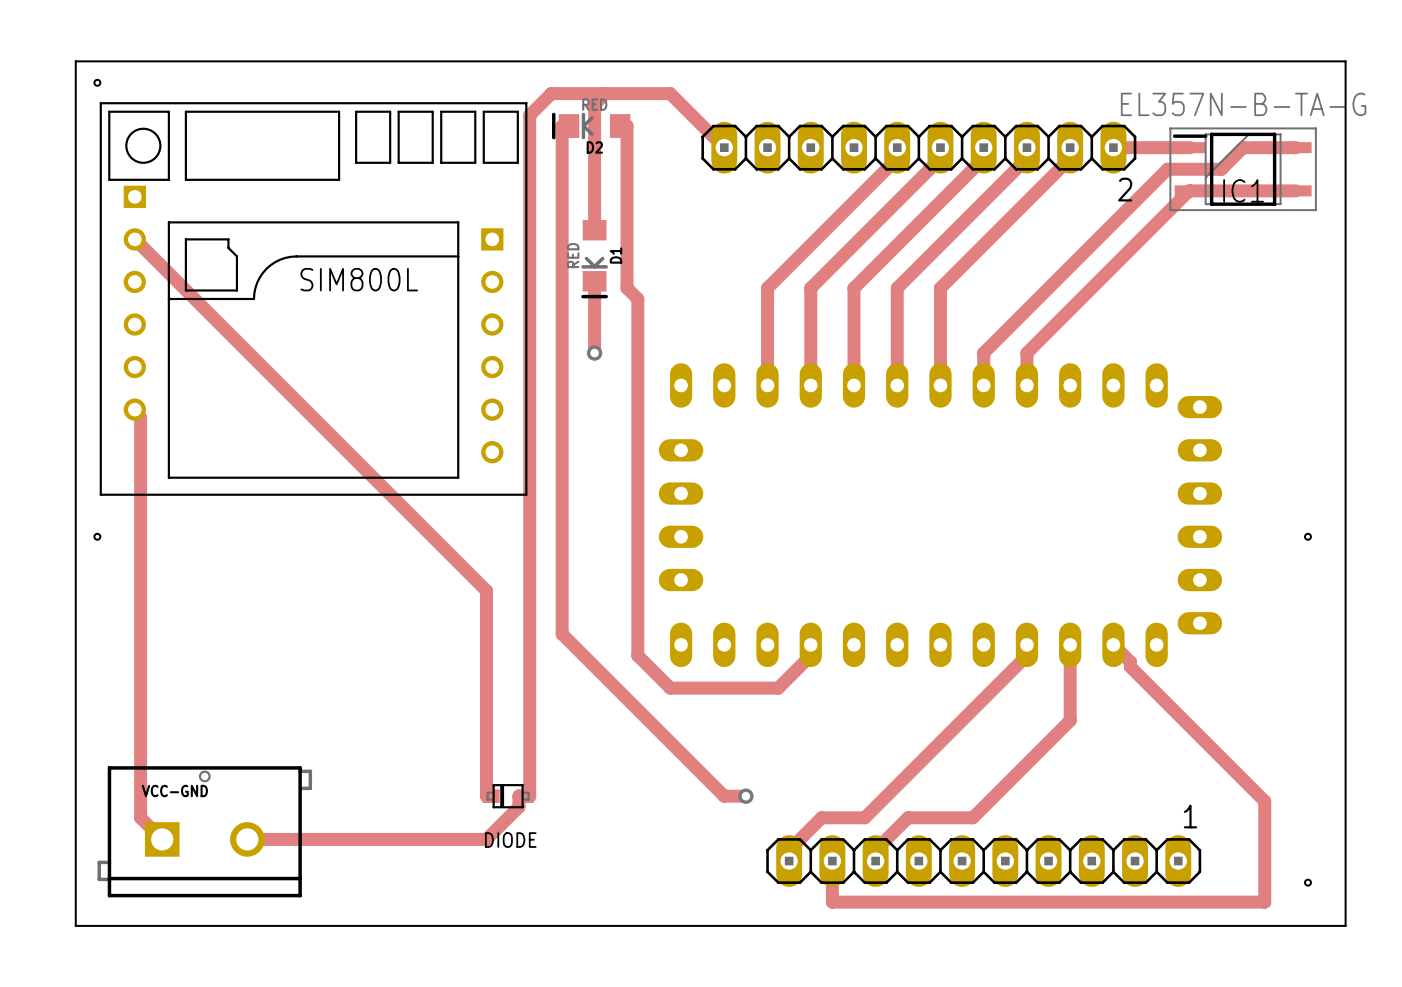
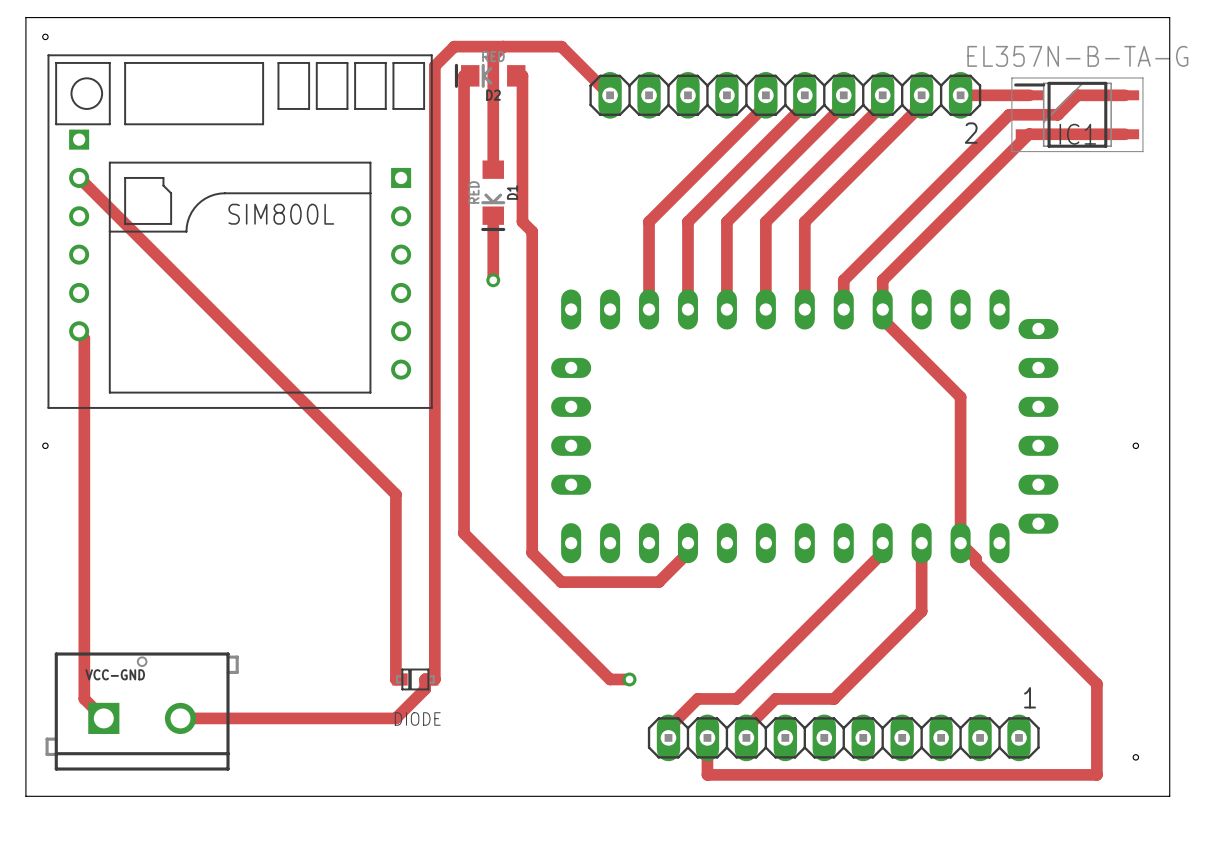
track: none -> (882, 309) (882, 319) (960, 397) (960, 543)

